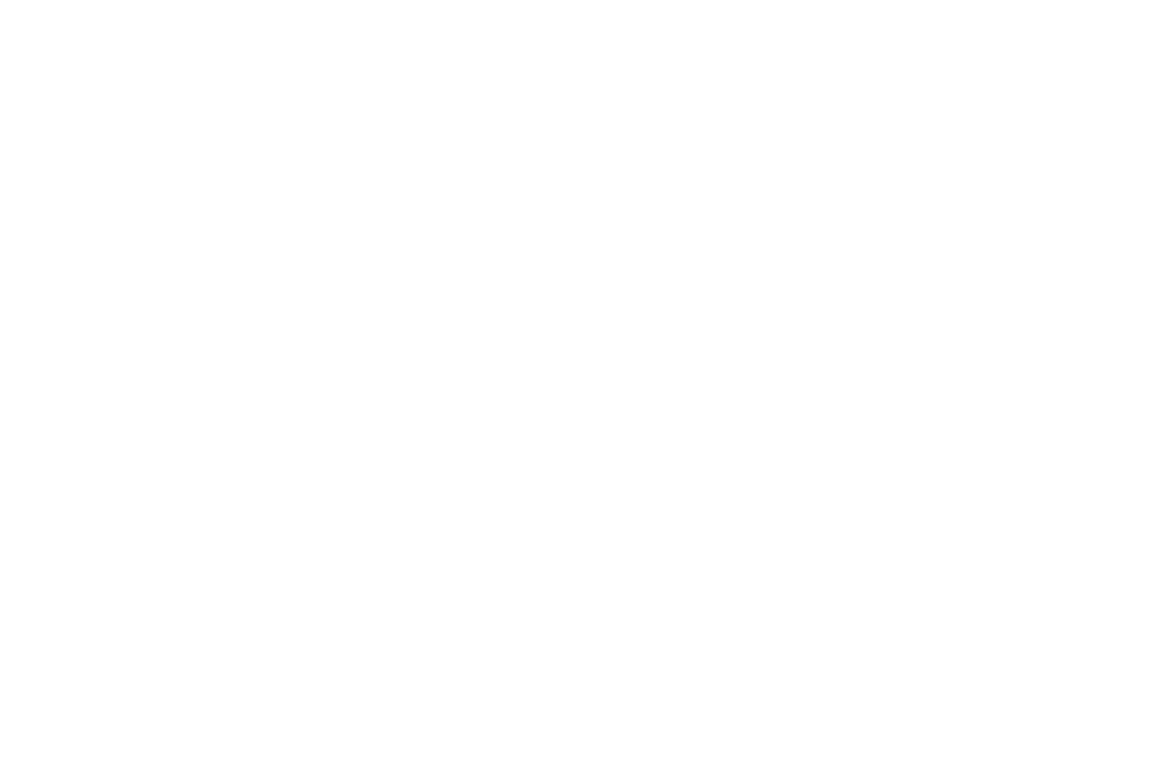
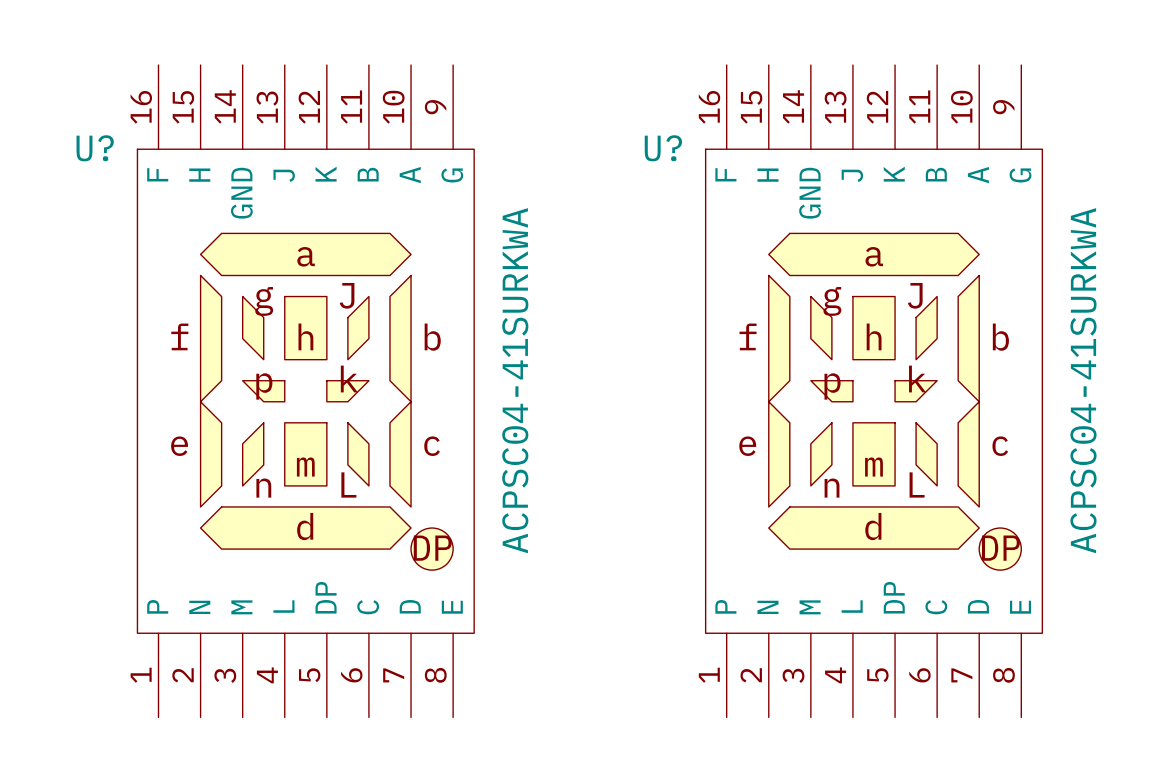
U?: none -> ACPSC04-41SURKWA (305, 391)
U?: none -> ACPSC04-41SURKWA (873, 391)

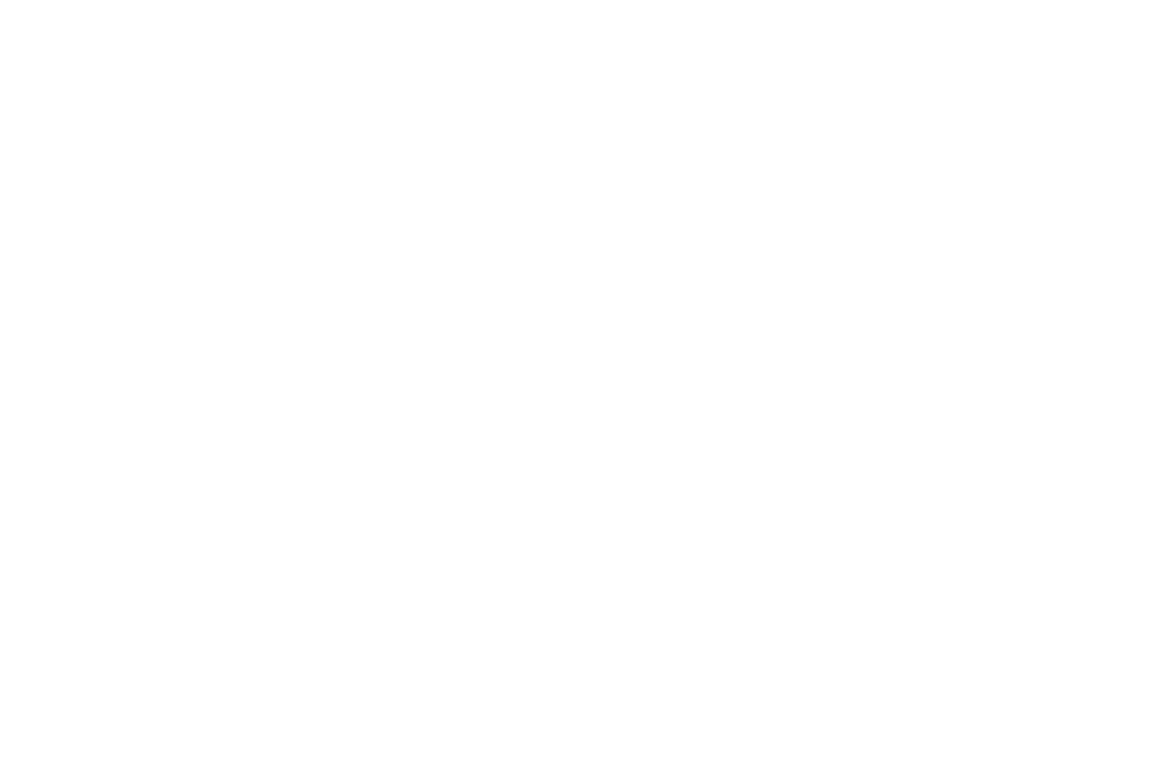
U?: ACPSC04-41SURKWA (305, 391) -> none
U?: ACPSC04-41SURKWA (873, 391) -> none

